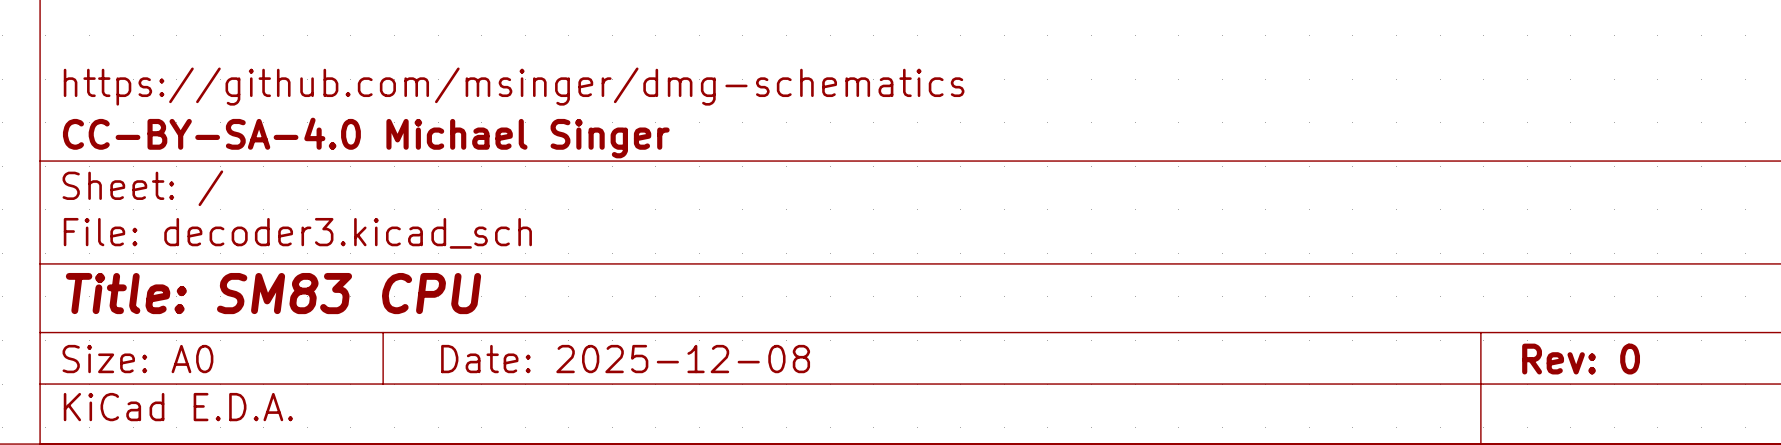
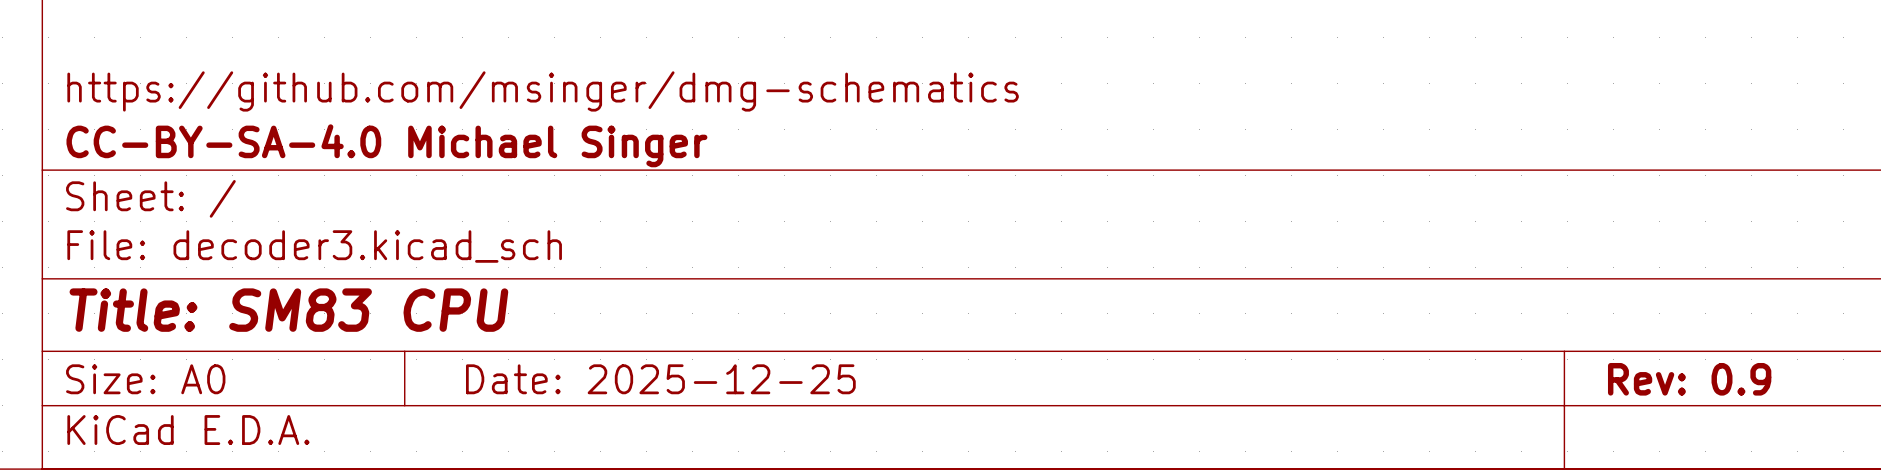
title block: Date: 2025-12-08 (625, 359) -> Date: 2025-12-25 (660, 379)
title block: Rev: 0 (1581, 359) -> Rev: 0.9 (1689, 379)

